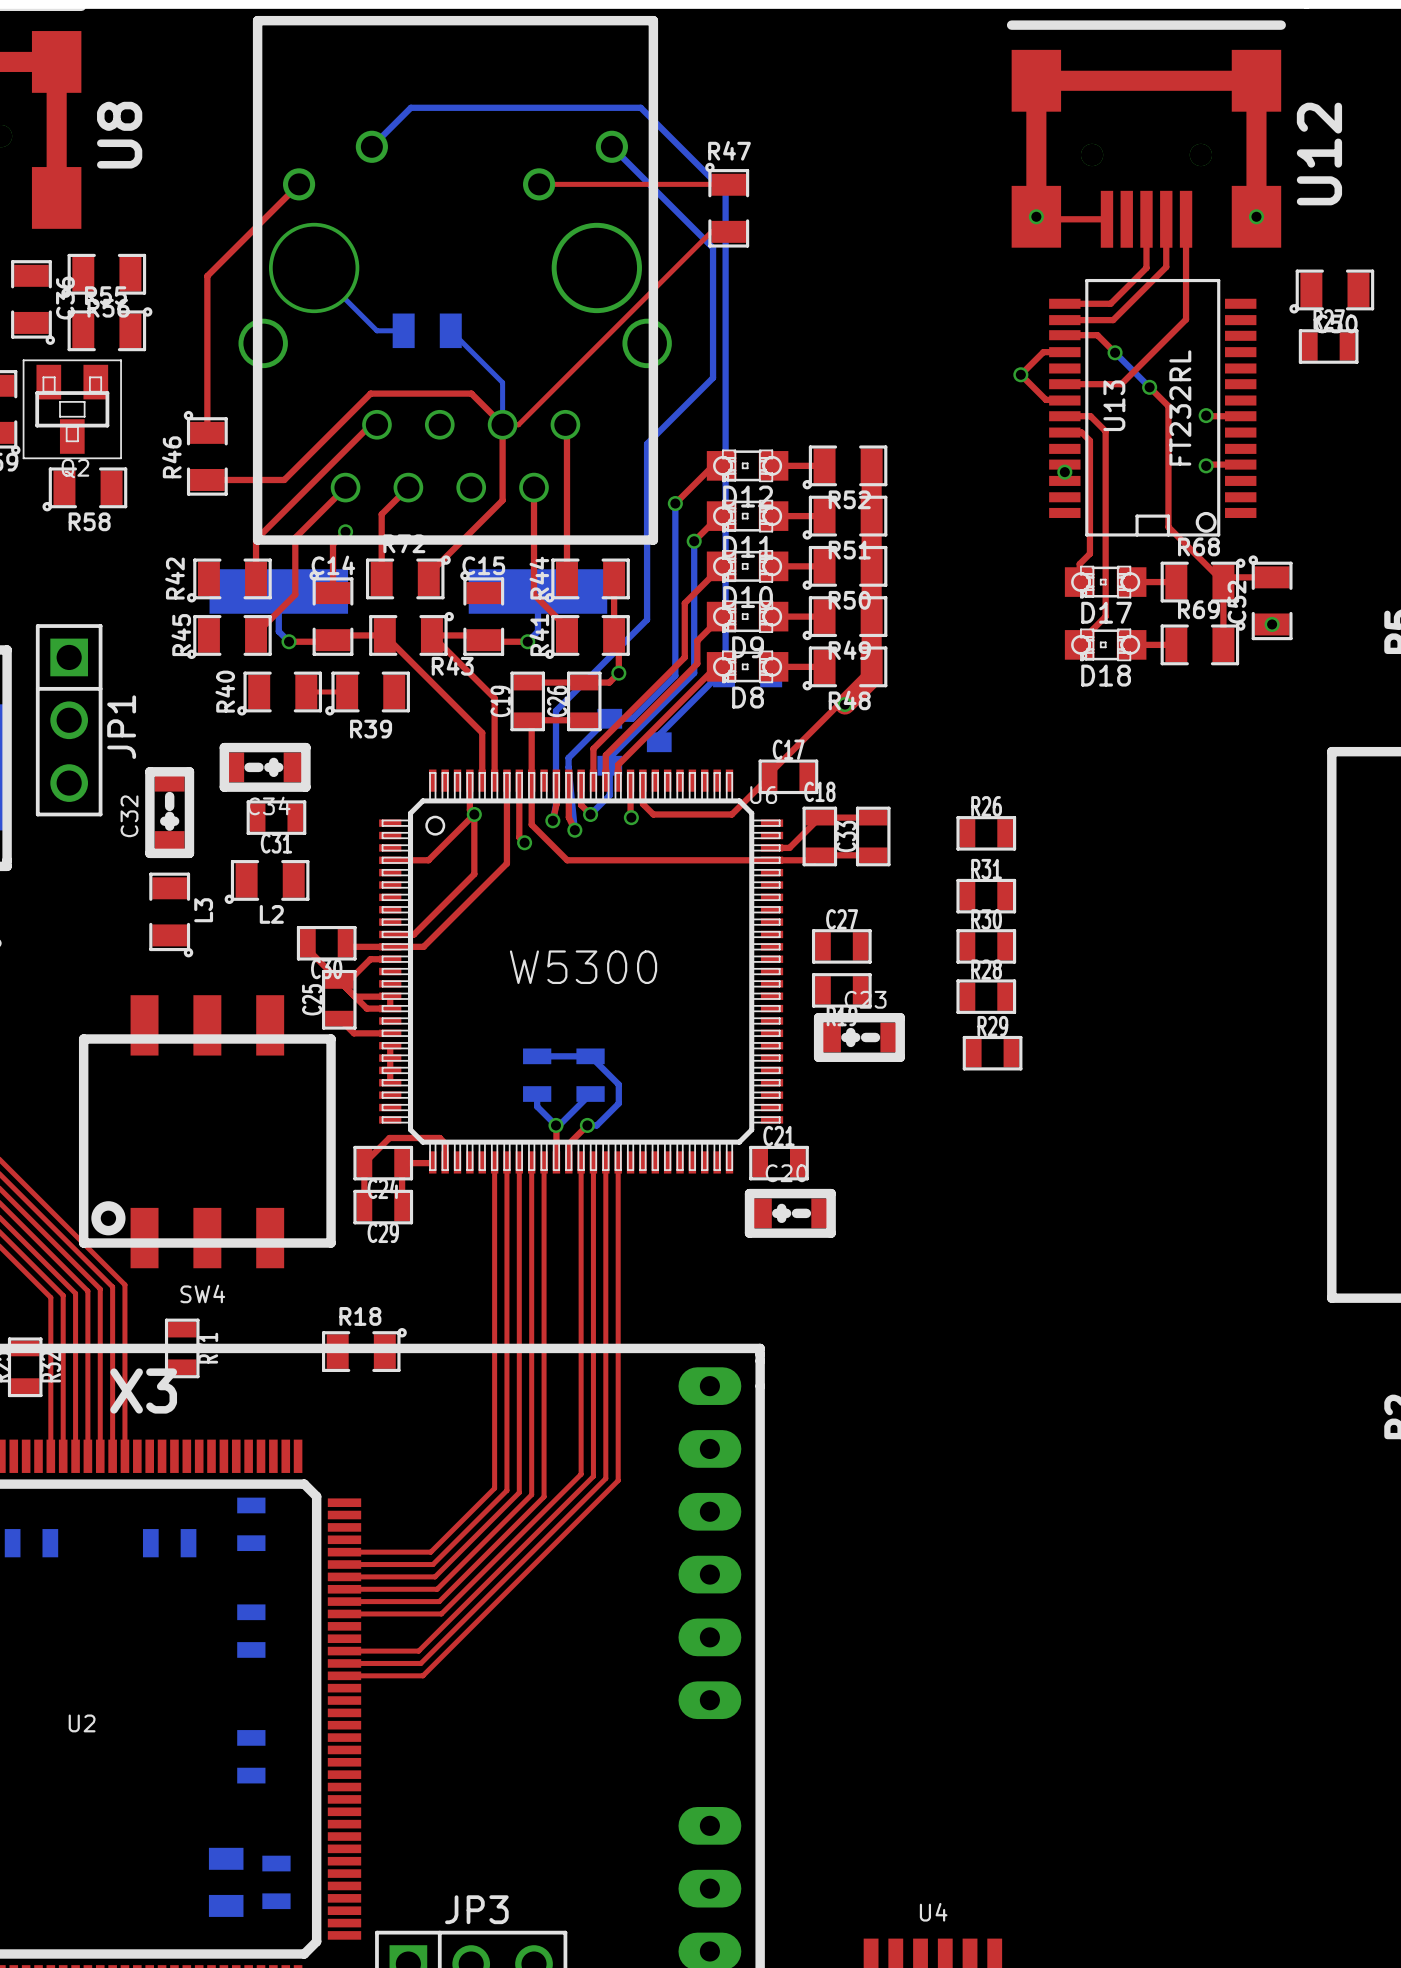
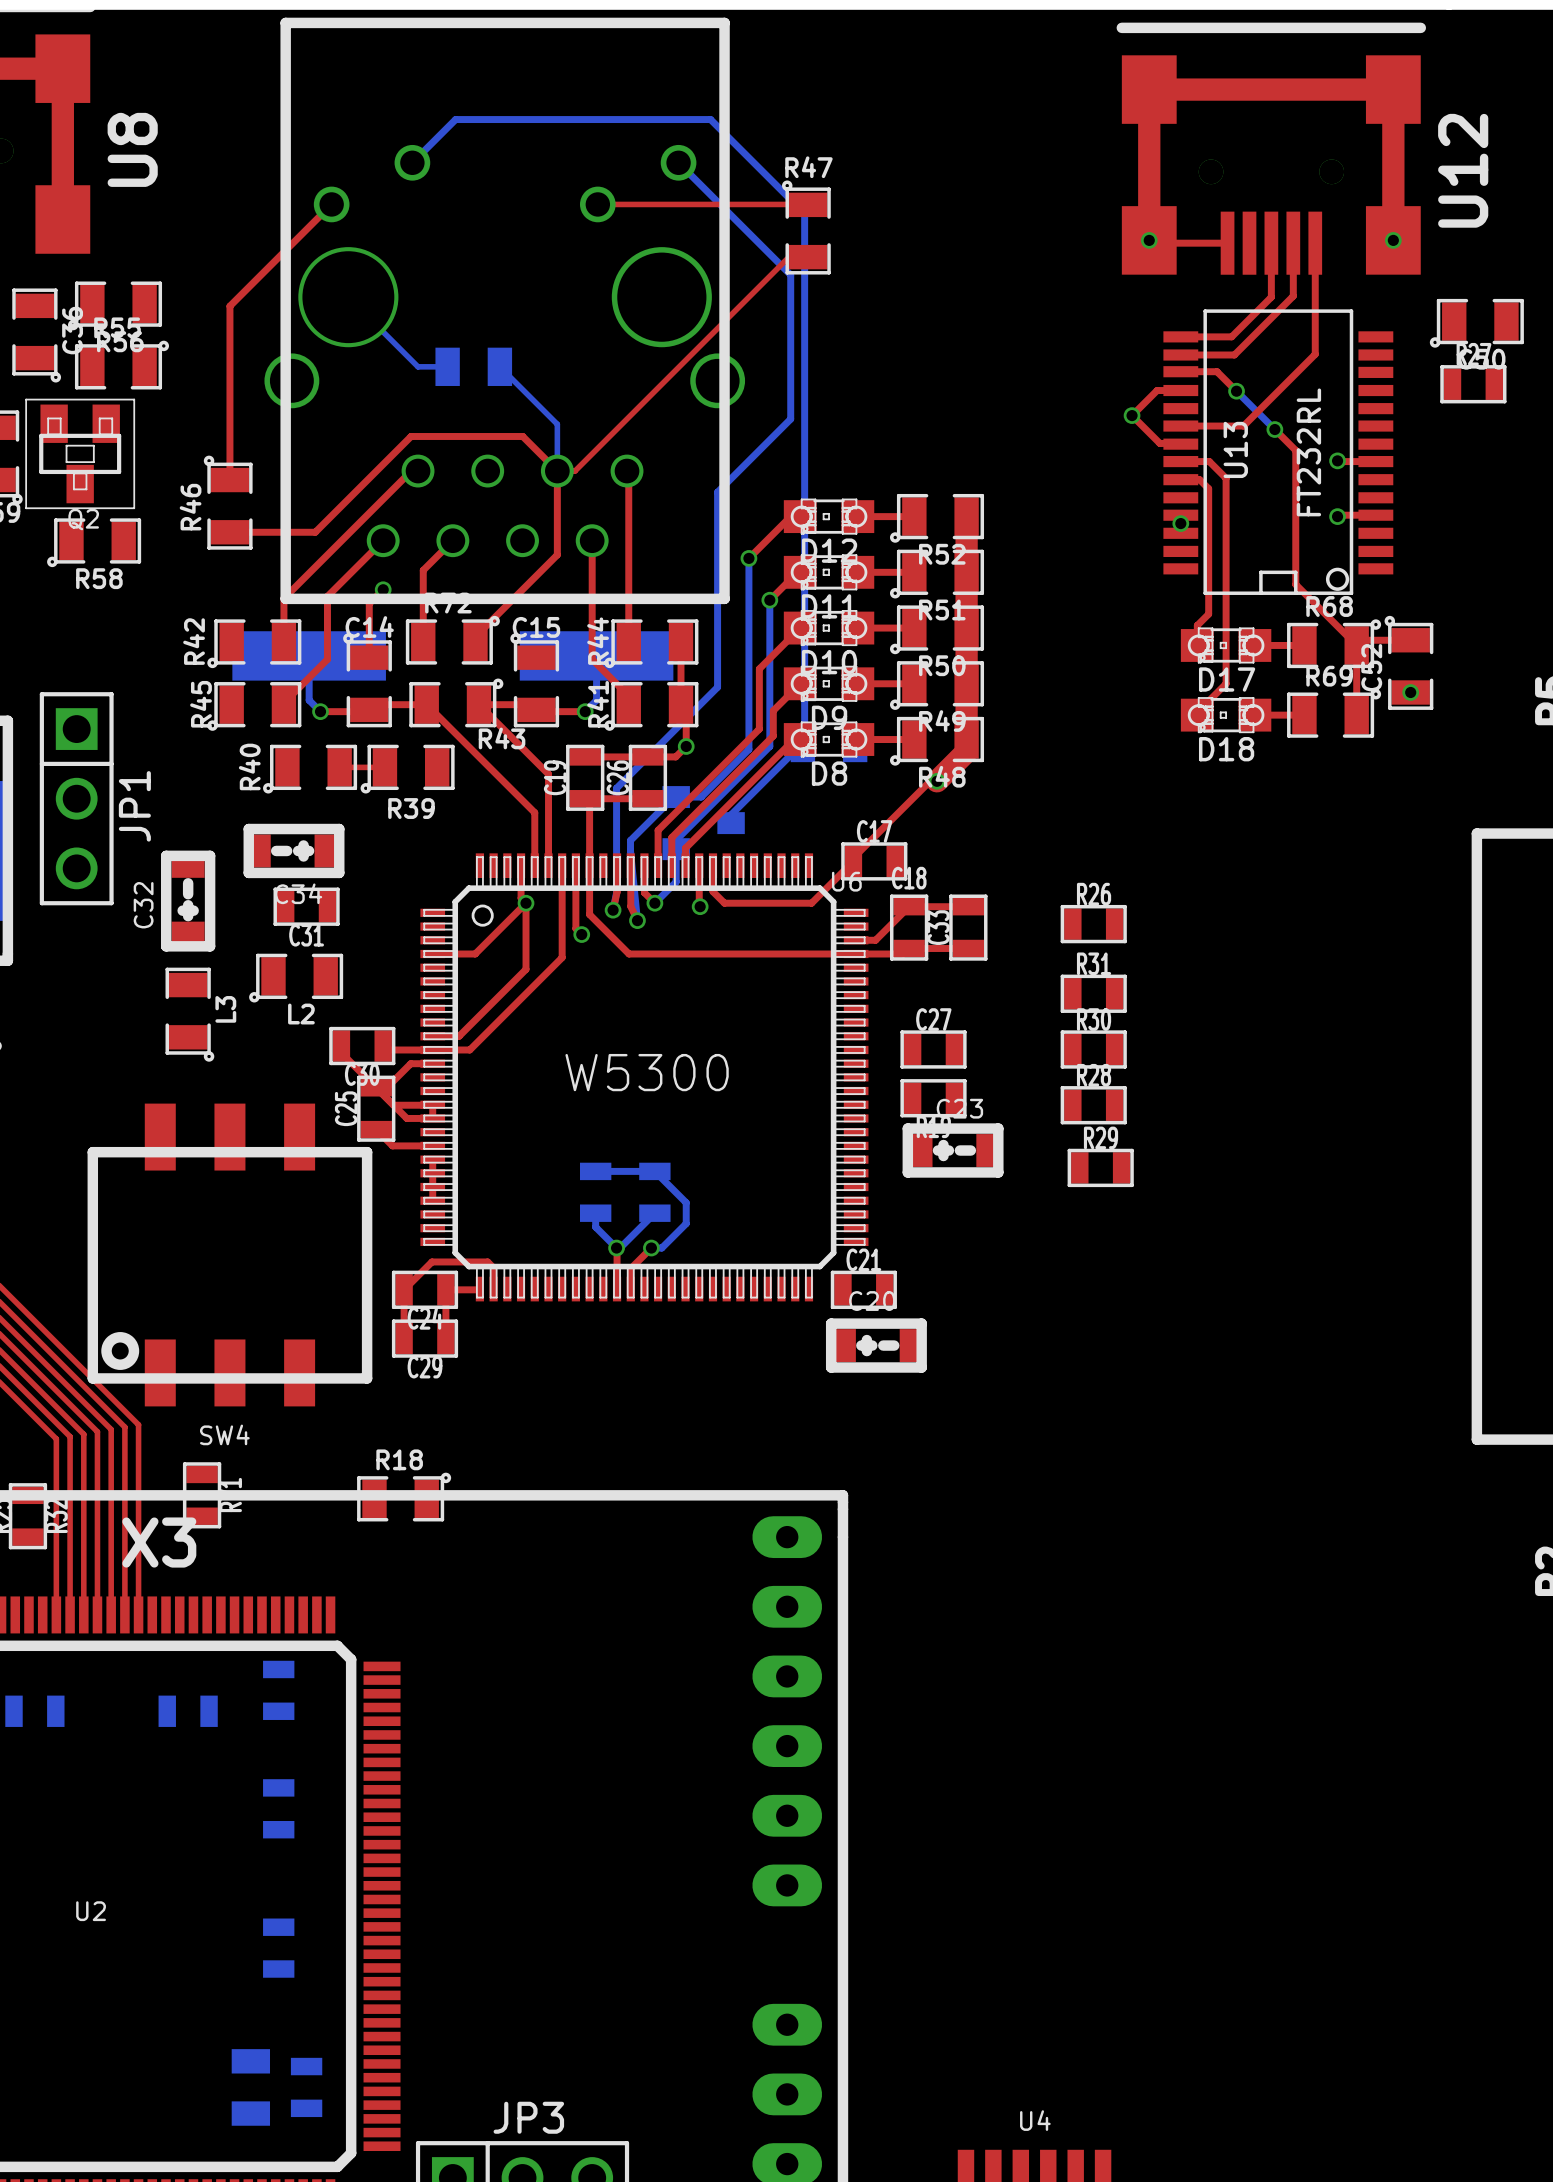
top track: (494, 1162) (494, 1488) (430, 1552) (344, 1552) -> none
top track: (506, 1162) (506, 1490) (432, 1564) (344, 1564) -> none
top track: (519, 1162) (519, 1492) (435, 1576) (344, 1576) -> none
top track: (531, 1162) (531, 1494) (437, 1589) (344, 1589) -> none
top track: (544, 1162) (544, 1496) (439, 1601) (344, 1601) -> none
top track: (581, 1162) (581, 1474) (441, 1613) (344, 1613) -> none
top track: (593, 1162) (593, 1476) (418, 1651) (344, 1651) -> none
top track: (605, 1162) (605, 1478) (420, 1663) (344, 1663) -> none
top track: (618, 1162) (618, 1480) (422, 1675) (344, 1675) -> none

